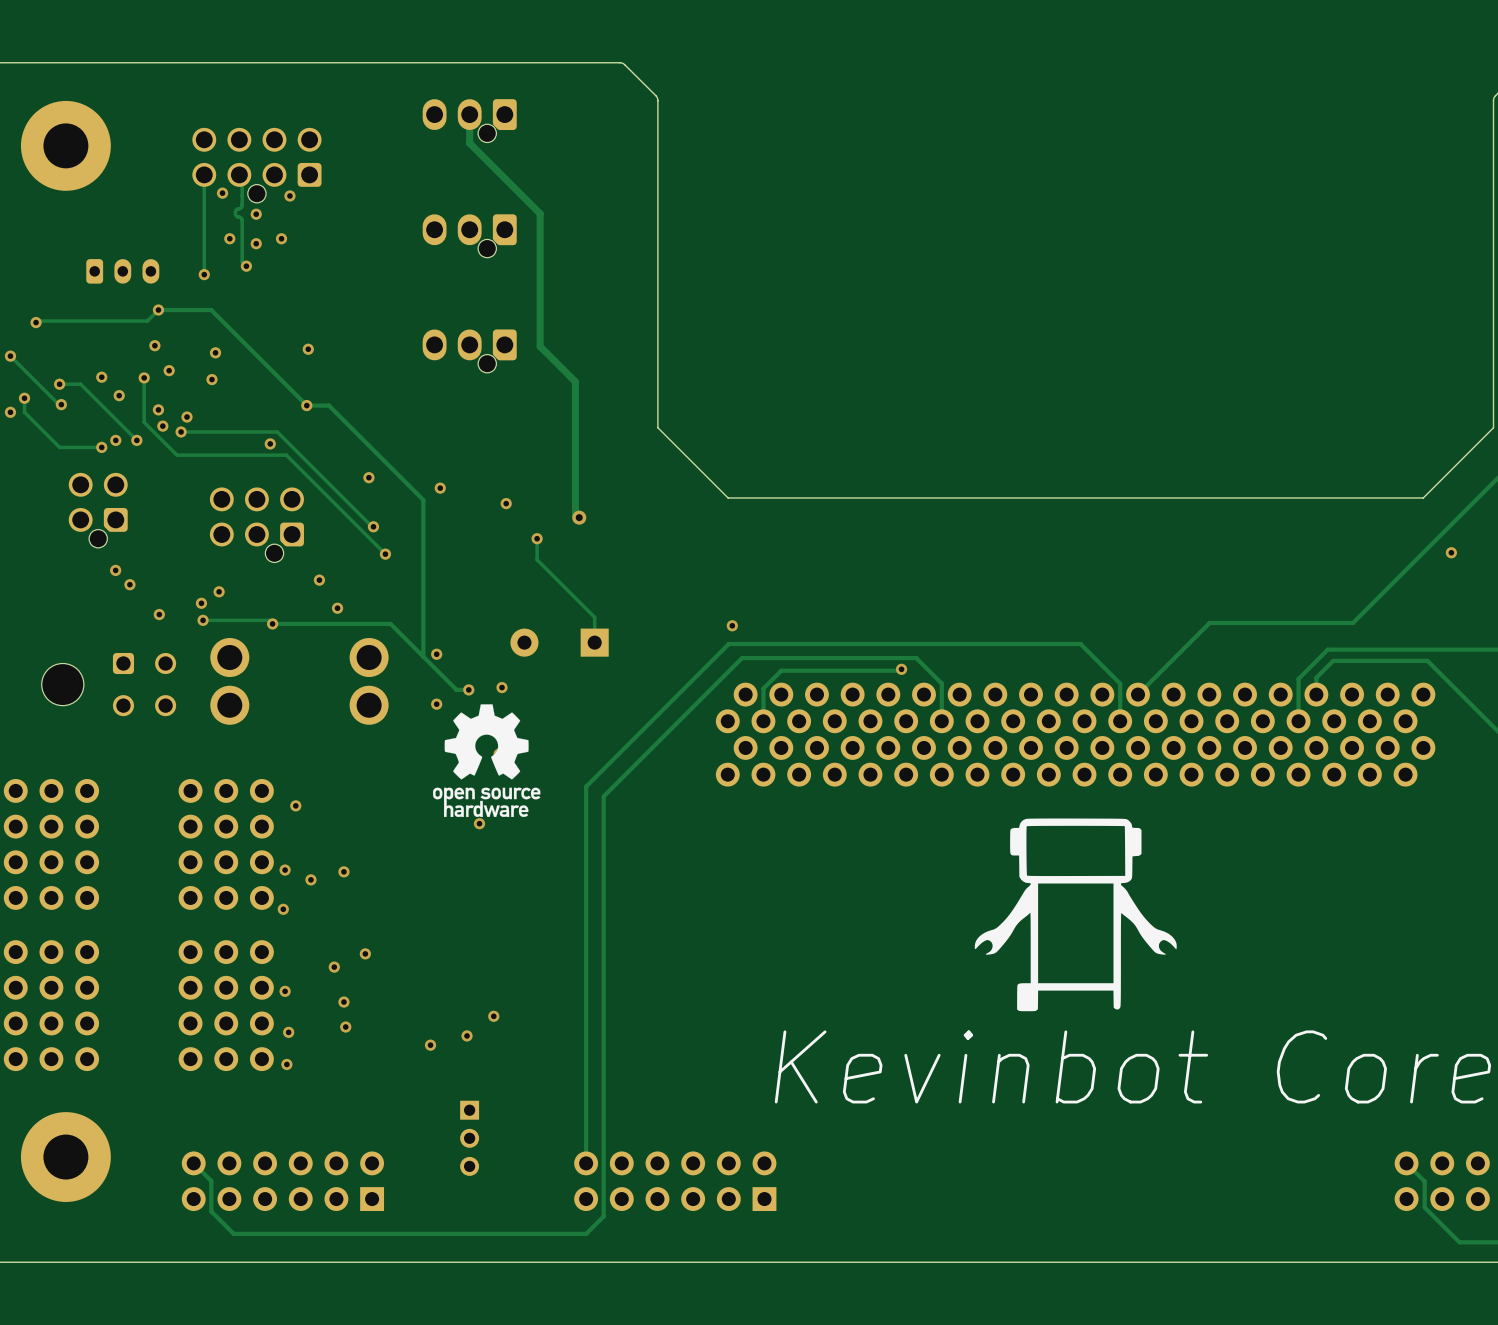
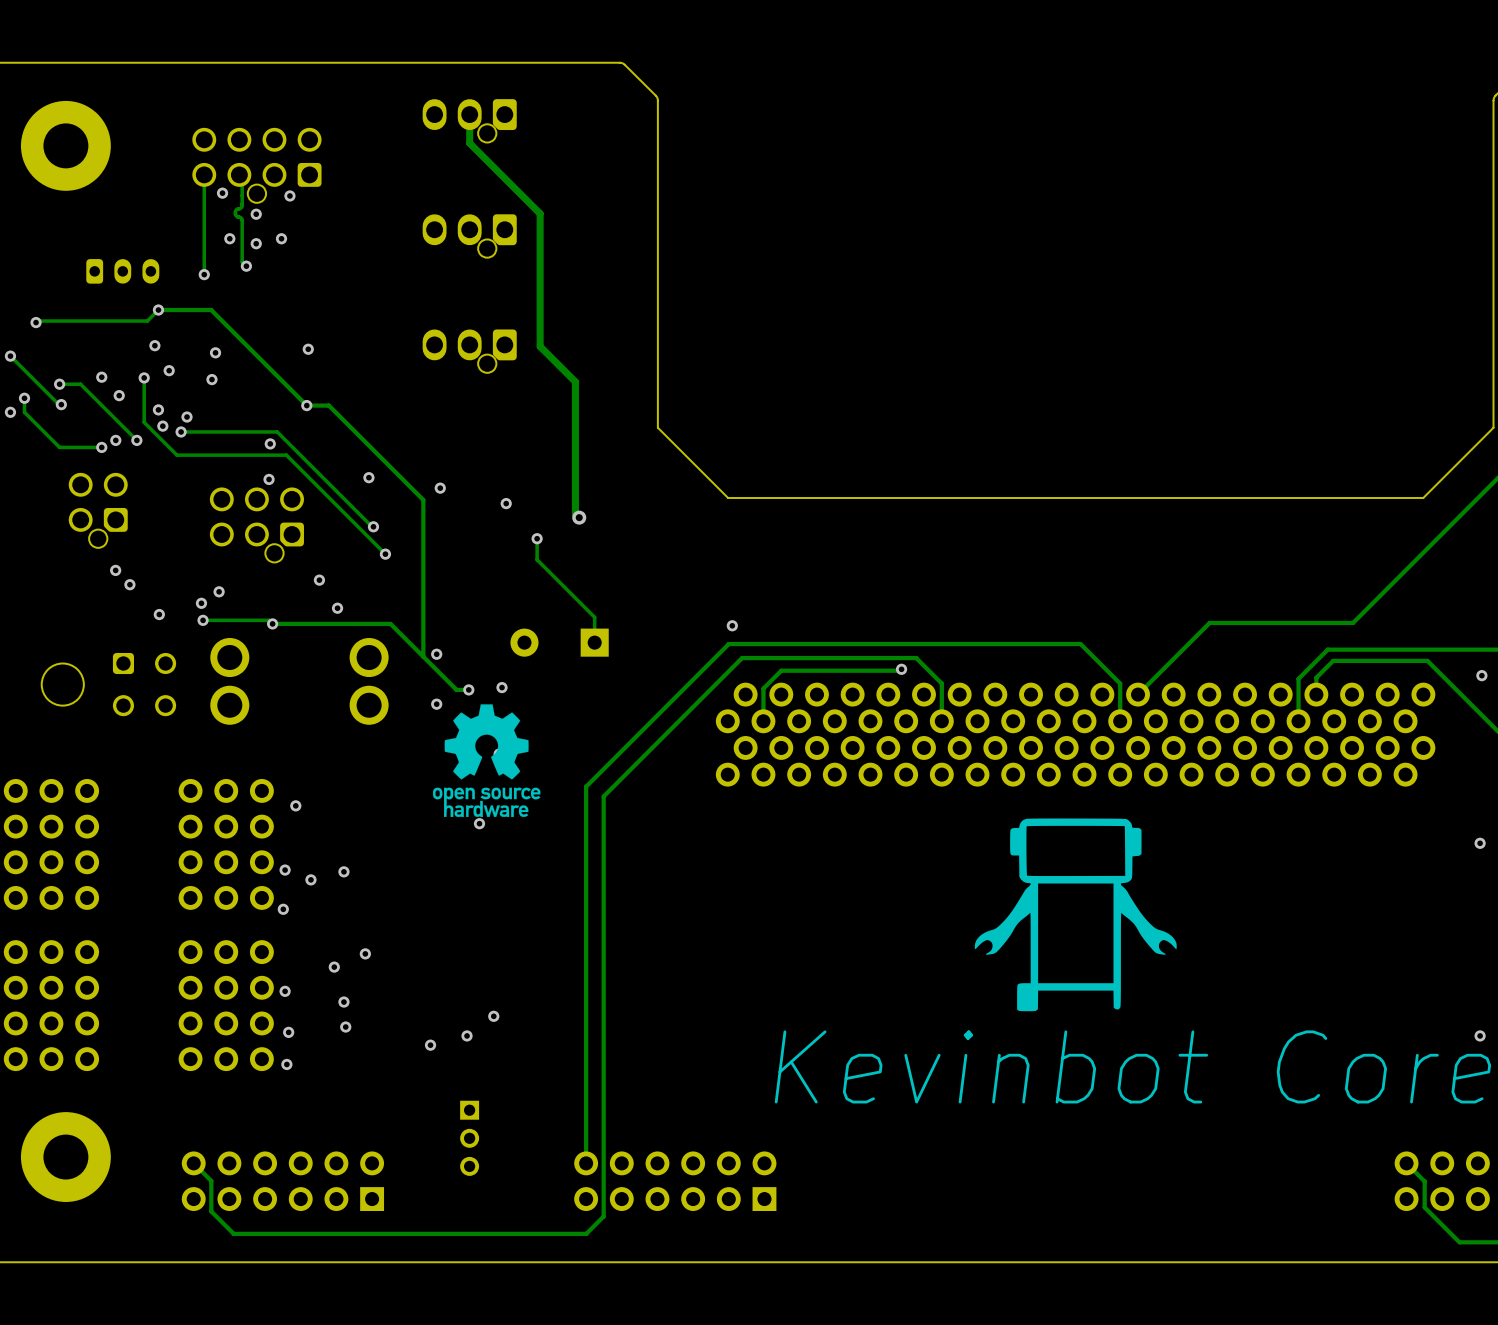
via: none -> (269, 479)
via: (1451, 552) -> none
via: none -> (1481, 675)
via: none -> (1480, 843)
via: none -> (1480, 1035)

